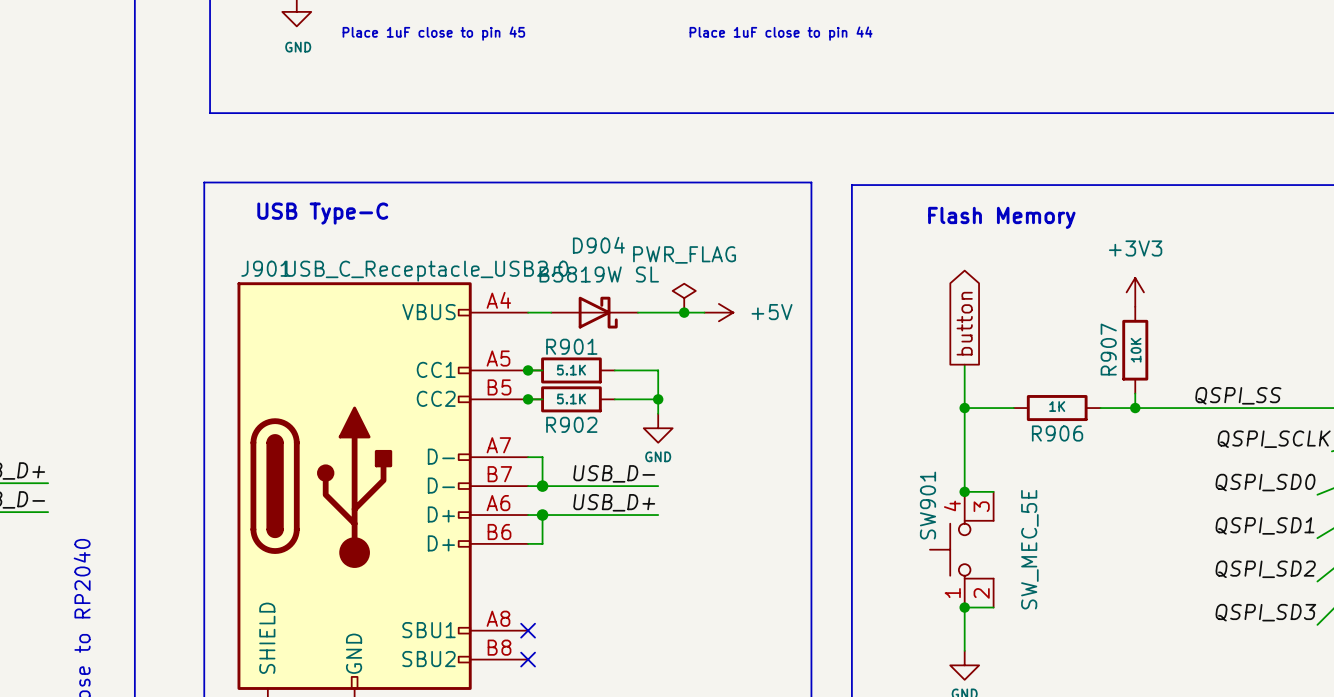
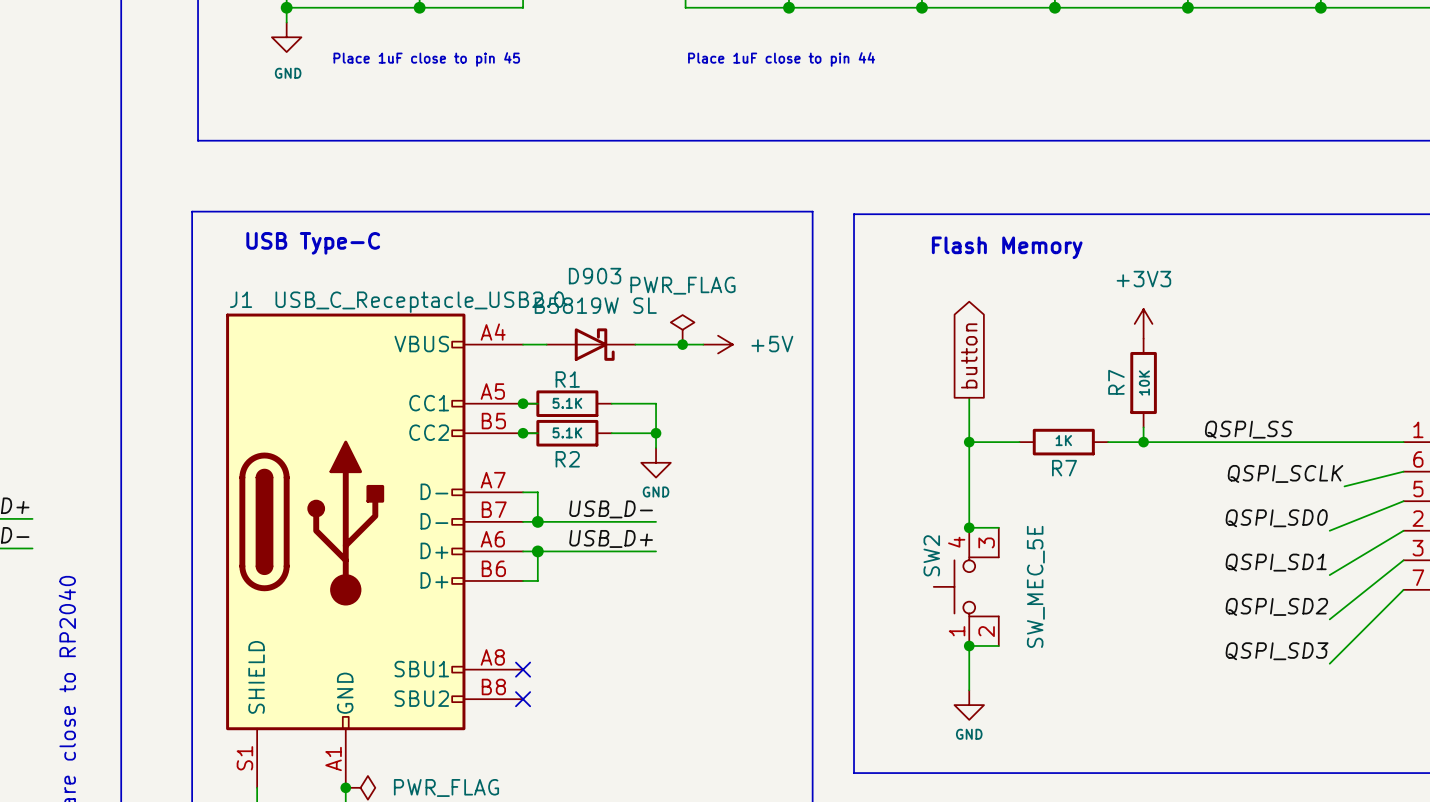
D904 name: D904 (598, 245) -> D903 (595, 276)
J901 name: J901 (265, 268) -> J1 (241, 299)
R901 name: R901 (571, 346) -> R1 (567, 379)
R907 name: R907 (1108, 349) -> R7 (1116, 382)
R902 name: R902 (571, 424) -> R2 (567, 459)
R906 name: R906 (1057, 433) -> R7 (1064, 468)
SW901 name: SW901 (928, 505) -> SW2 (931, 555)

